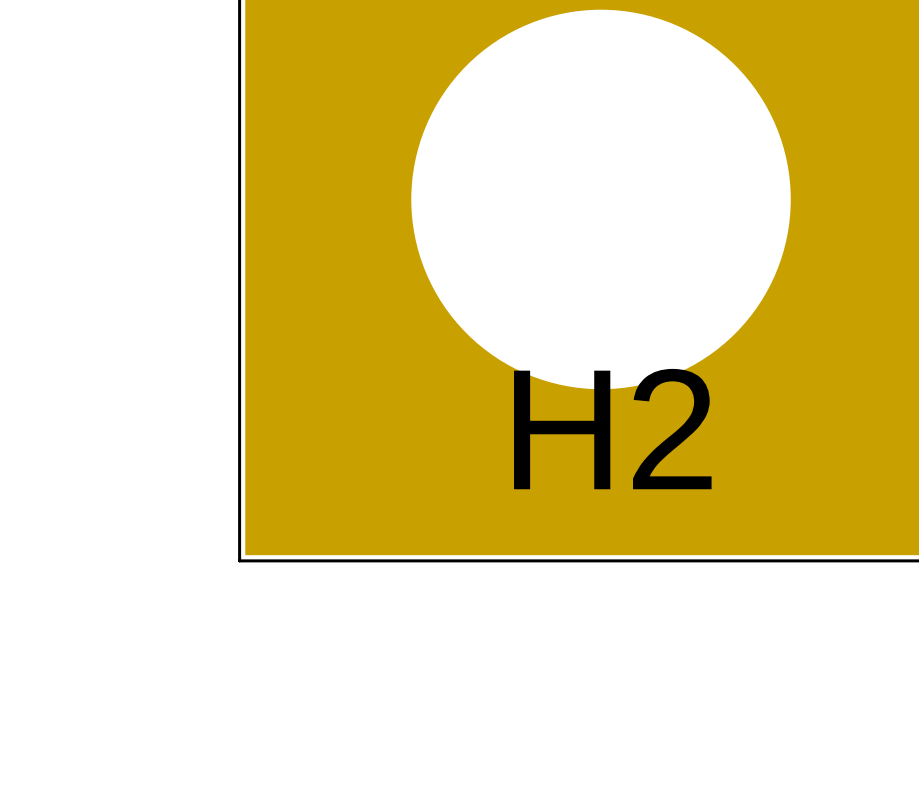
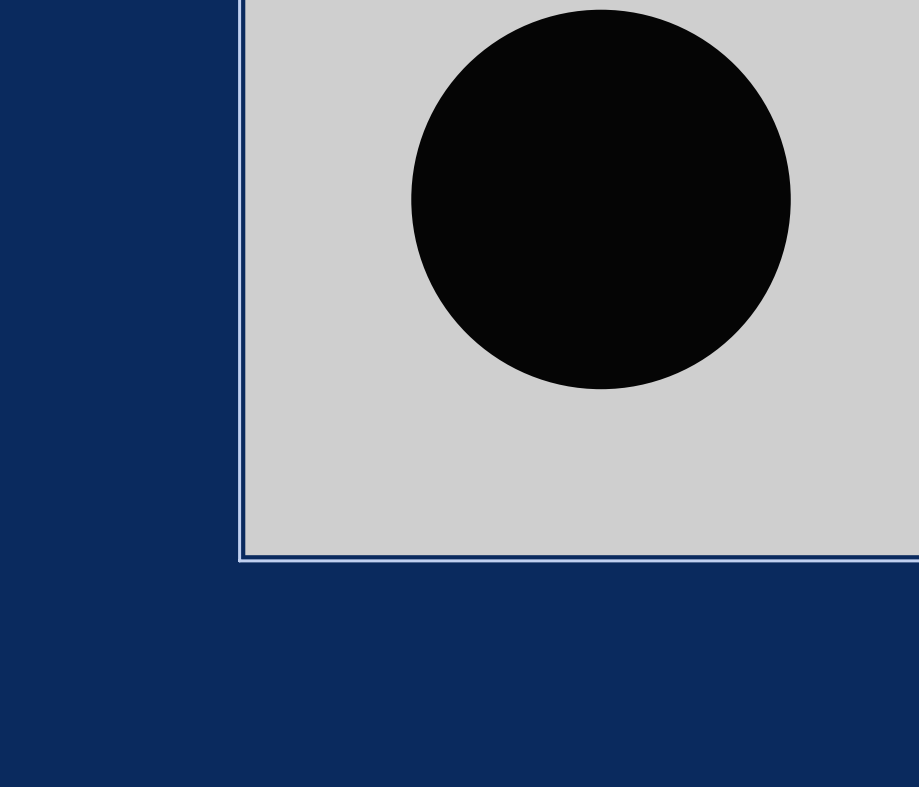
H2 name: H2 (612, 429) -> none

